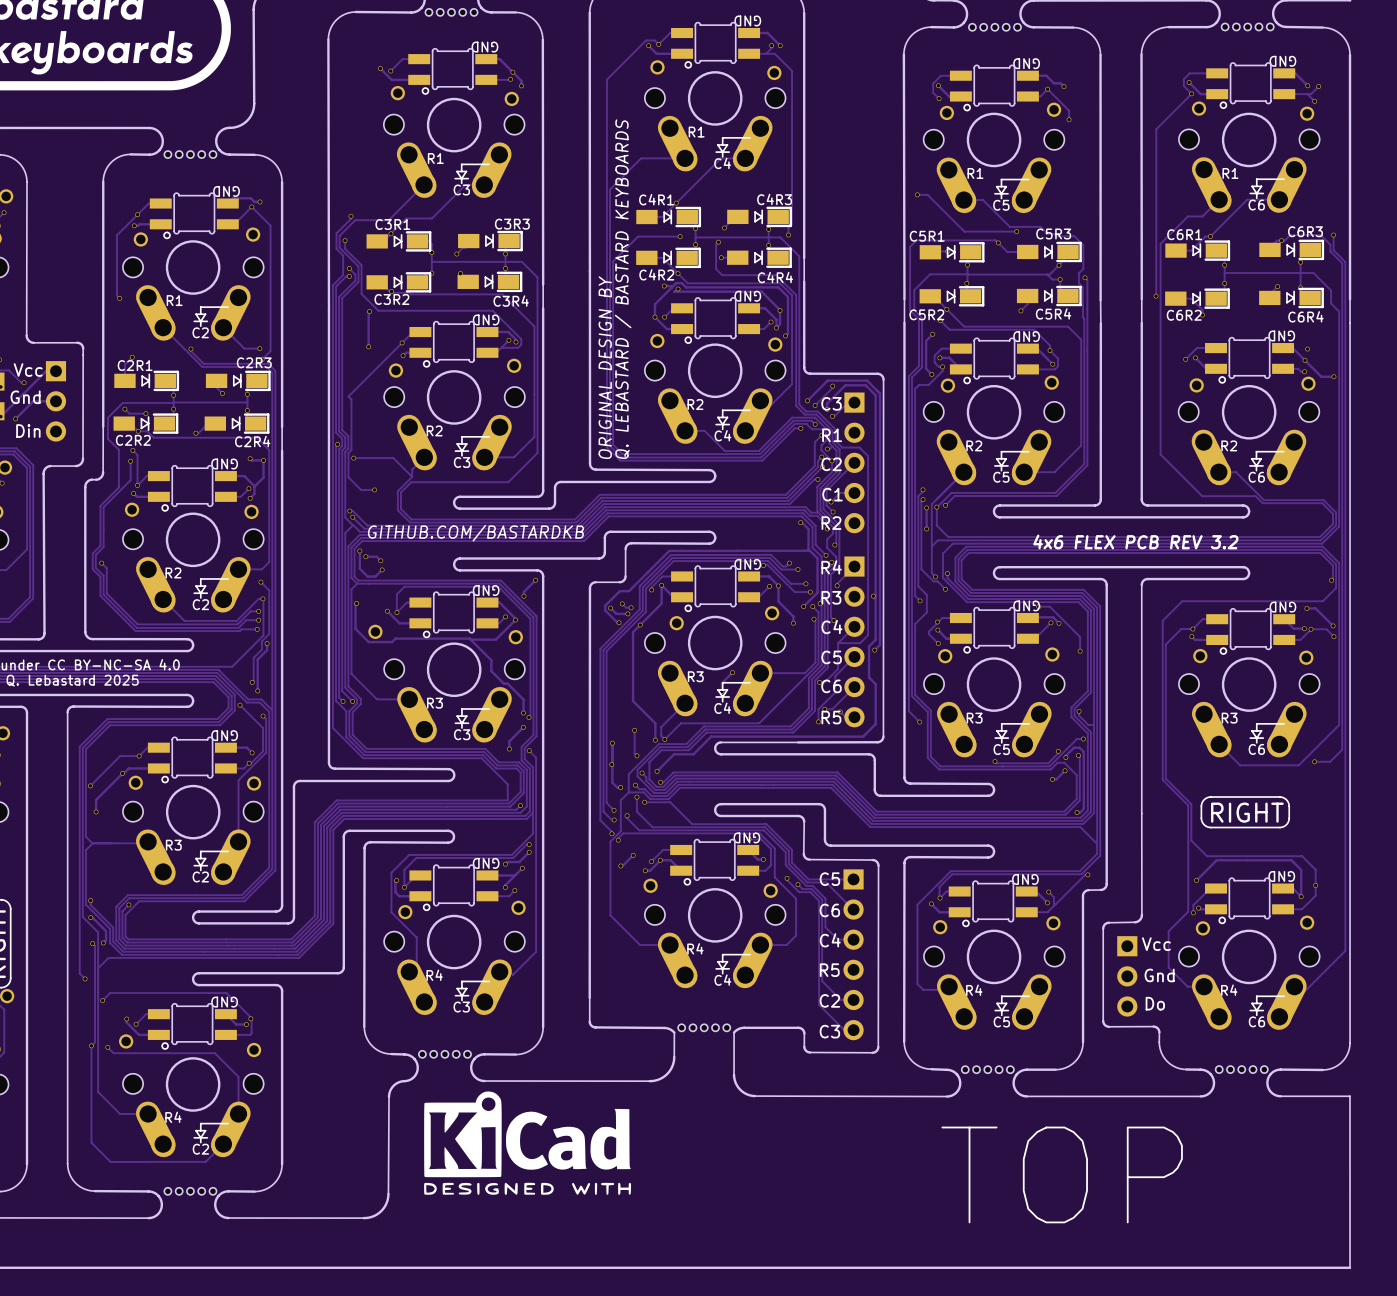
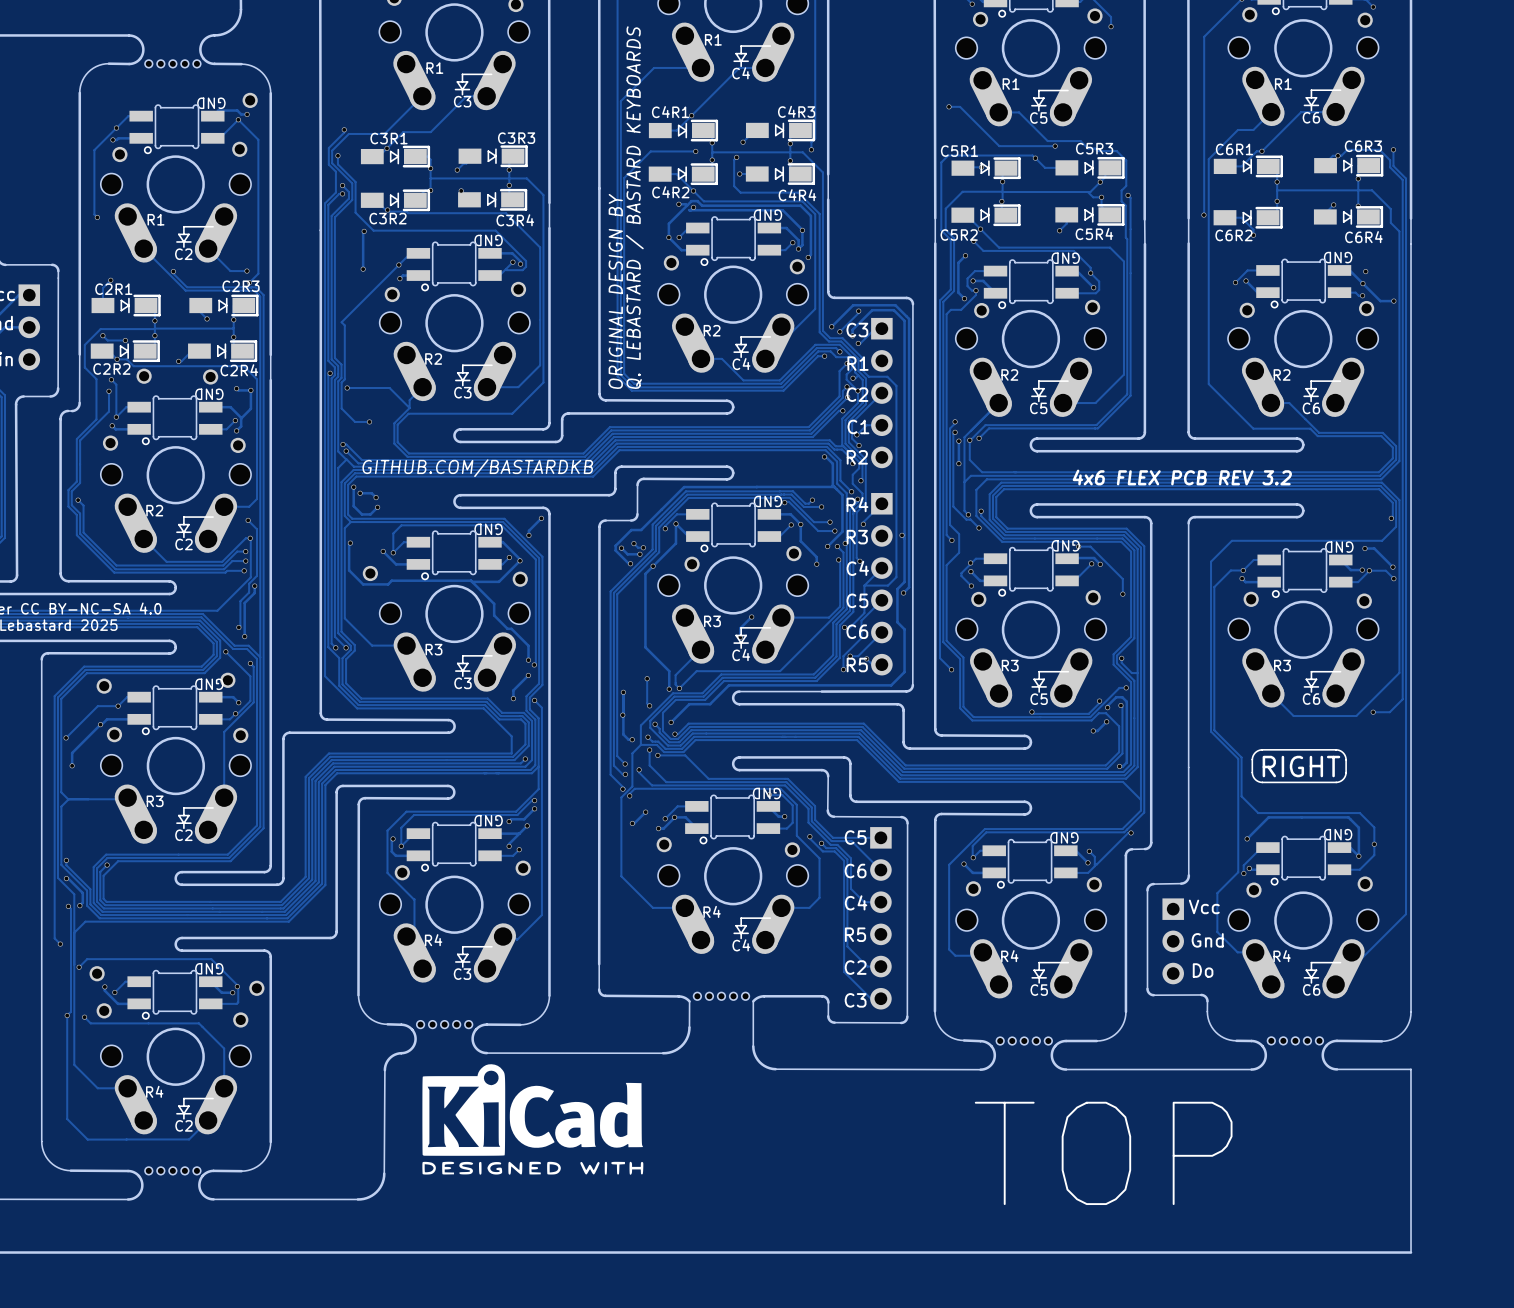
part: none -> (250, 100)
part: none -> (144, 376)
part: none -> (210, 376)
part: none -> (227, 680)
part: none -> (104, 686)
part: none -> (97, 973)
part: none -> (256, 988)

